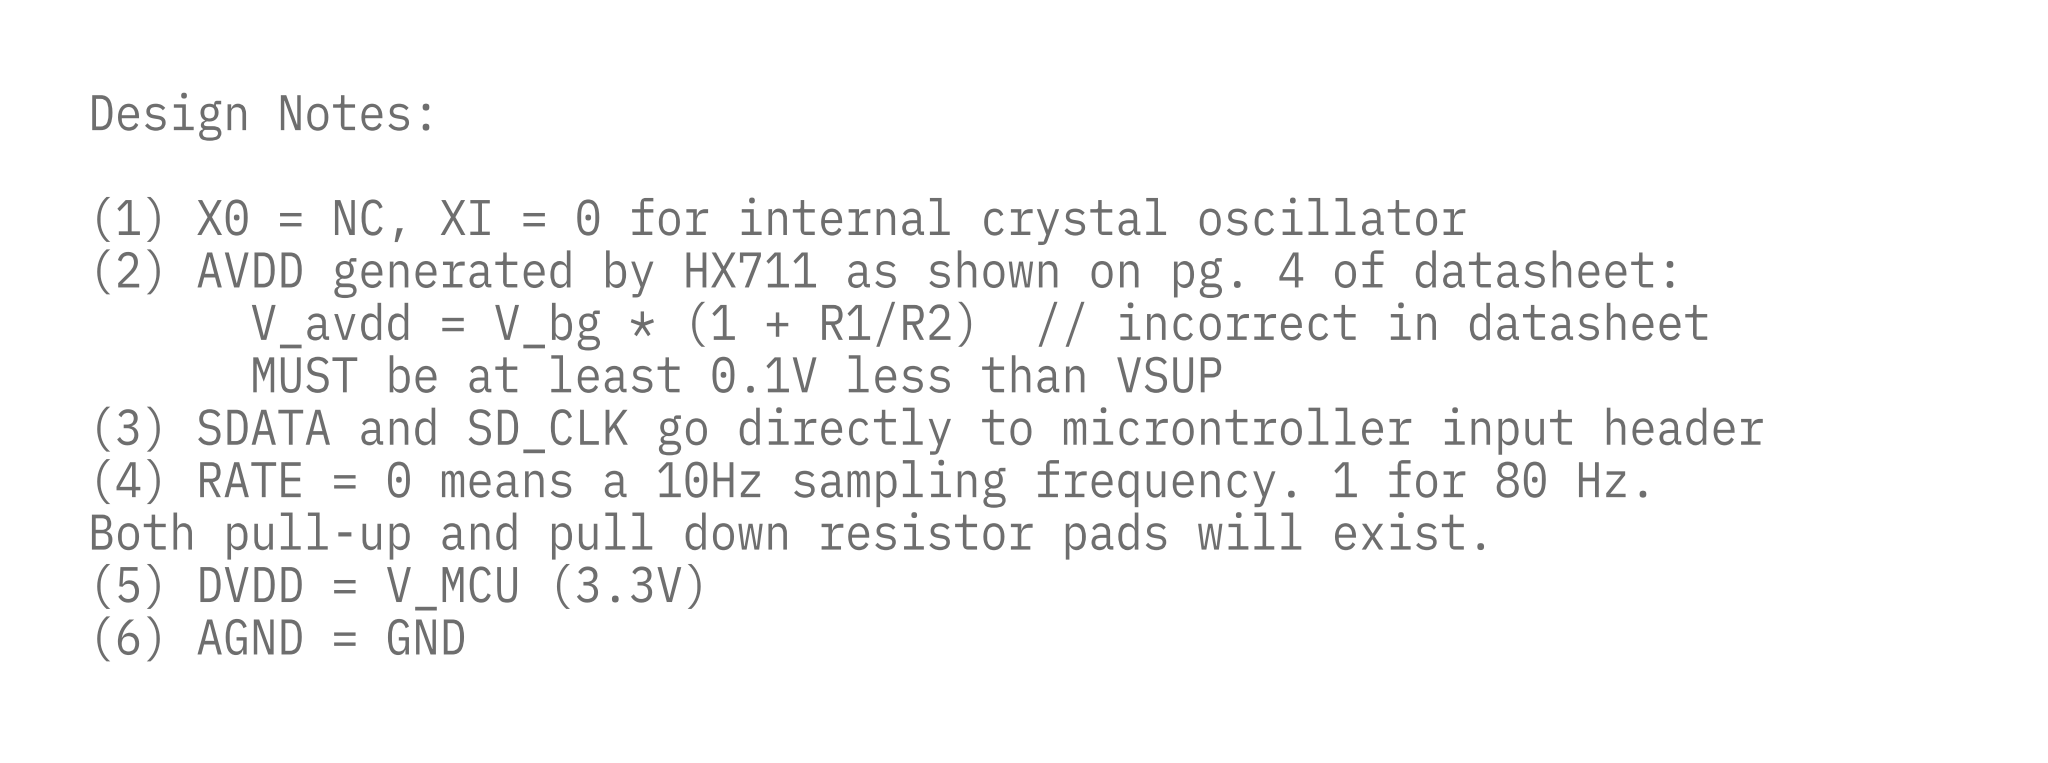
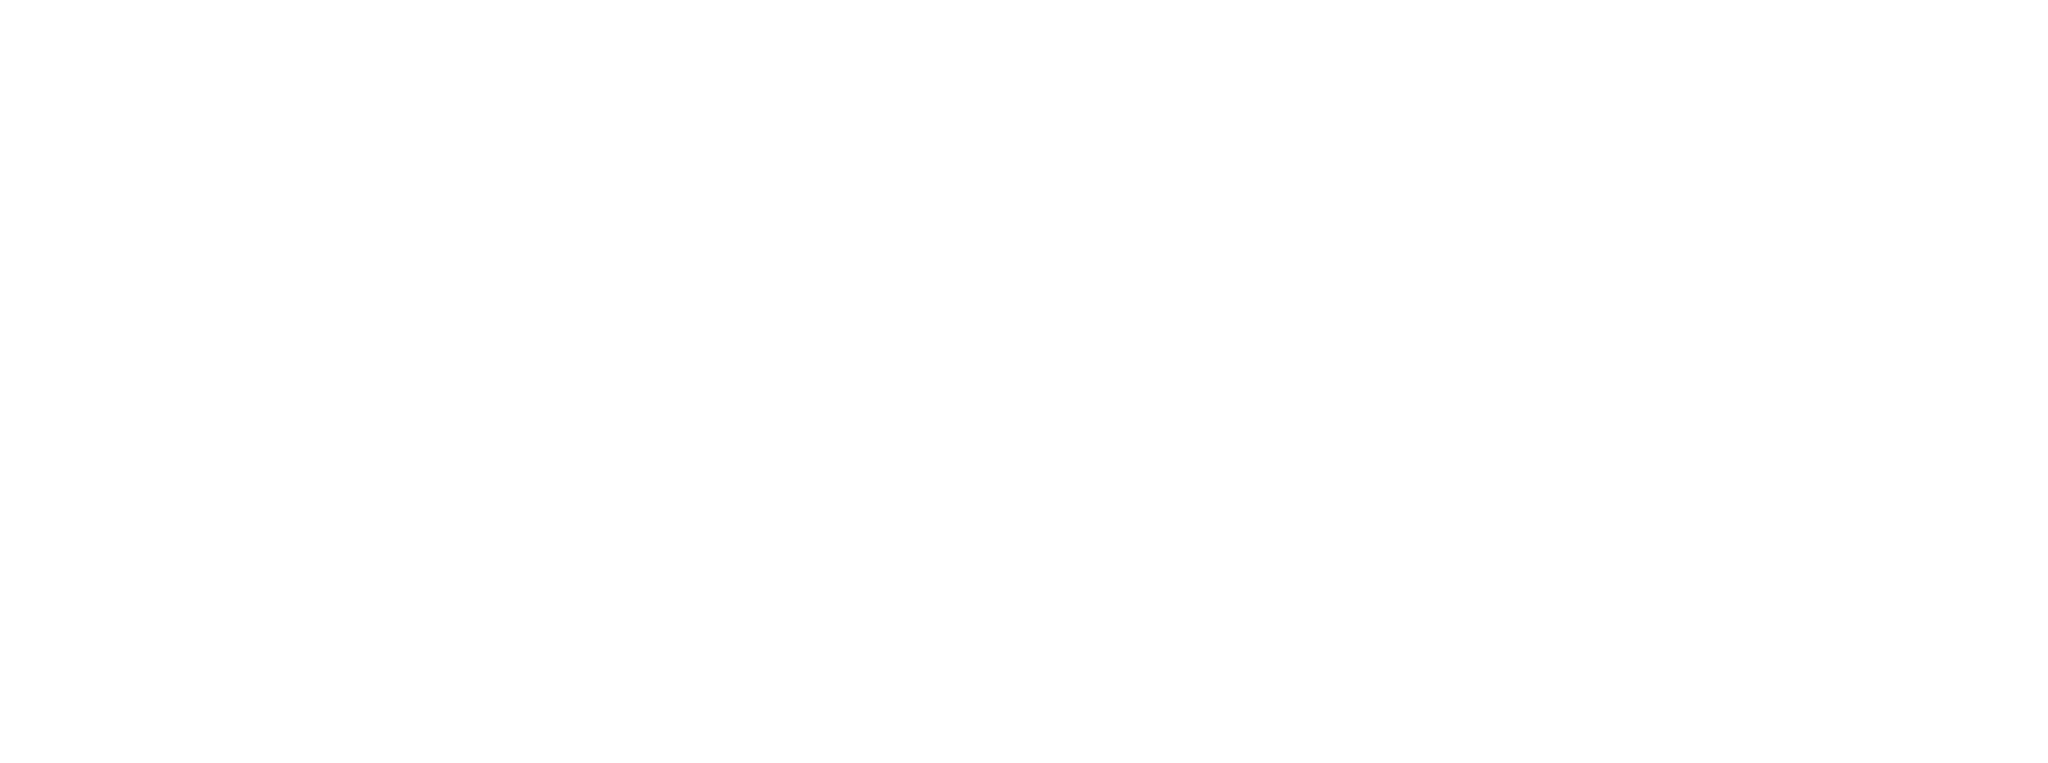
text: Design Notes: (260, 116) -> none
text: (1) X0 = NC, XI = 0 for internal crystal oscillator (781, 220) -> none
text: (2) AVDD generated by HX711 as shown on pg. 4 of datasheet: (885, 273) -> none
text: V_avdd = V_bg * (1 + R1/R2) // incorrect in datasheet (979, 326) -> none
text: MUST be at least 0.1V less than VSUP (737, 374) -> none
text: (3) SDATA and SD_CLK go directly to microntroller input header (929, 431) -> none
text: (4) RATE = 0 means a 10Hz sampling frequency. 1 for 80 Hz. (871, 483) -> none
text: Both pull-up and pull down resistor pads will exist. (787, 535) -> none
text: (5) DVDD = V_MCU (3.3V) (398, 587) -> none
text: (6) AGND = GND (280, 638) -> none

